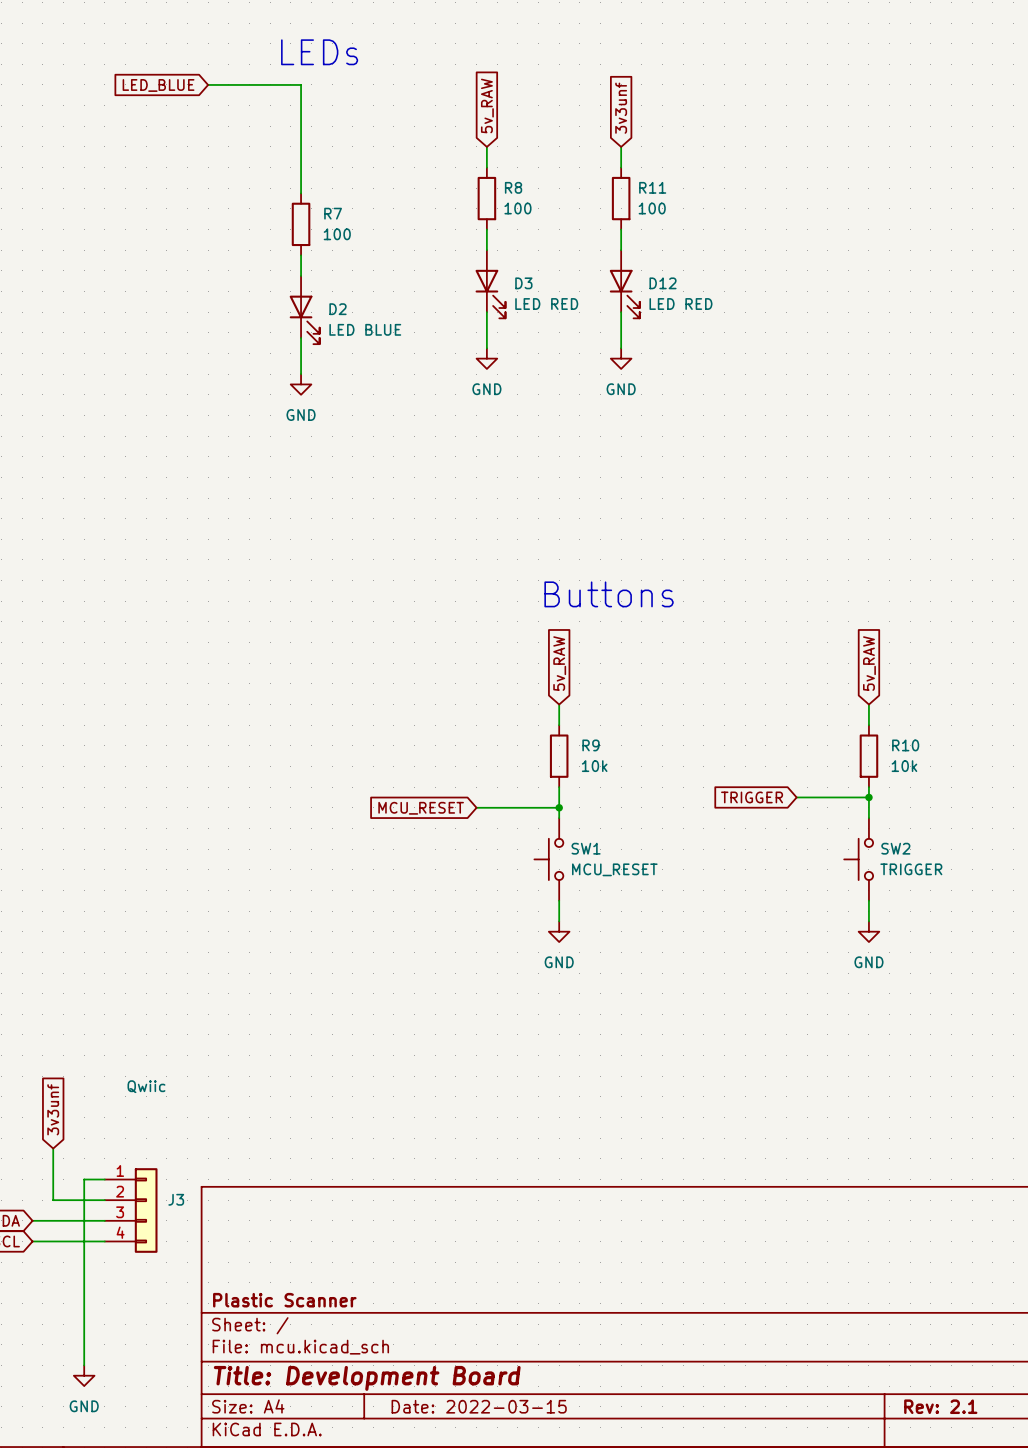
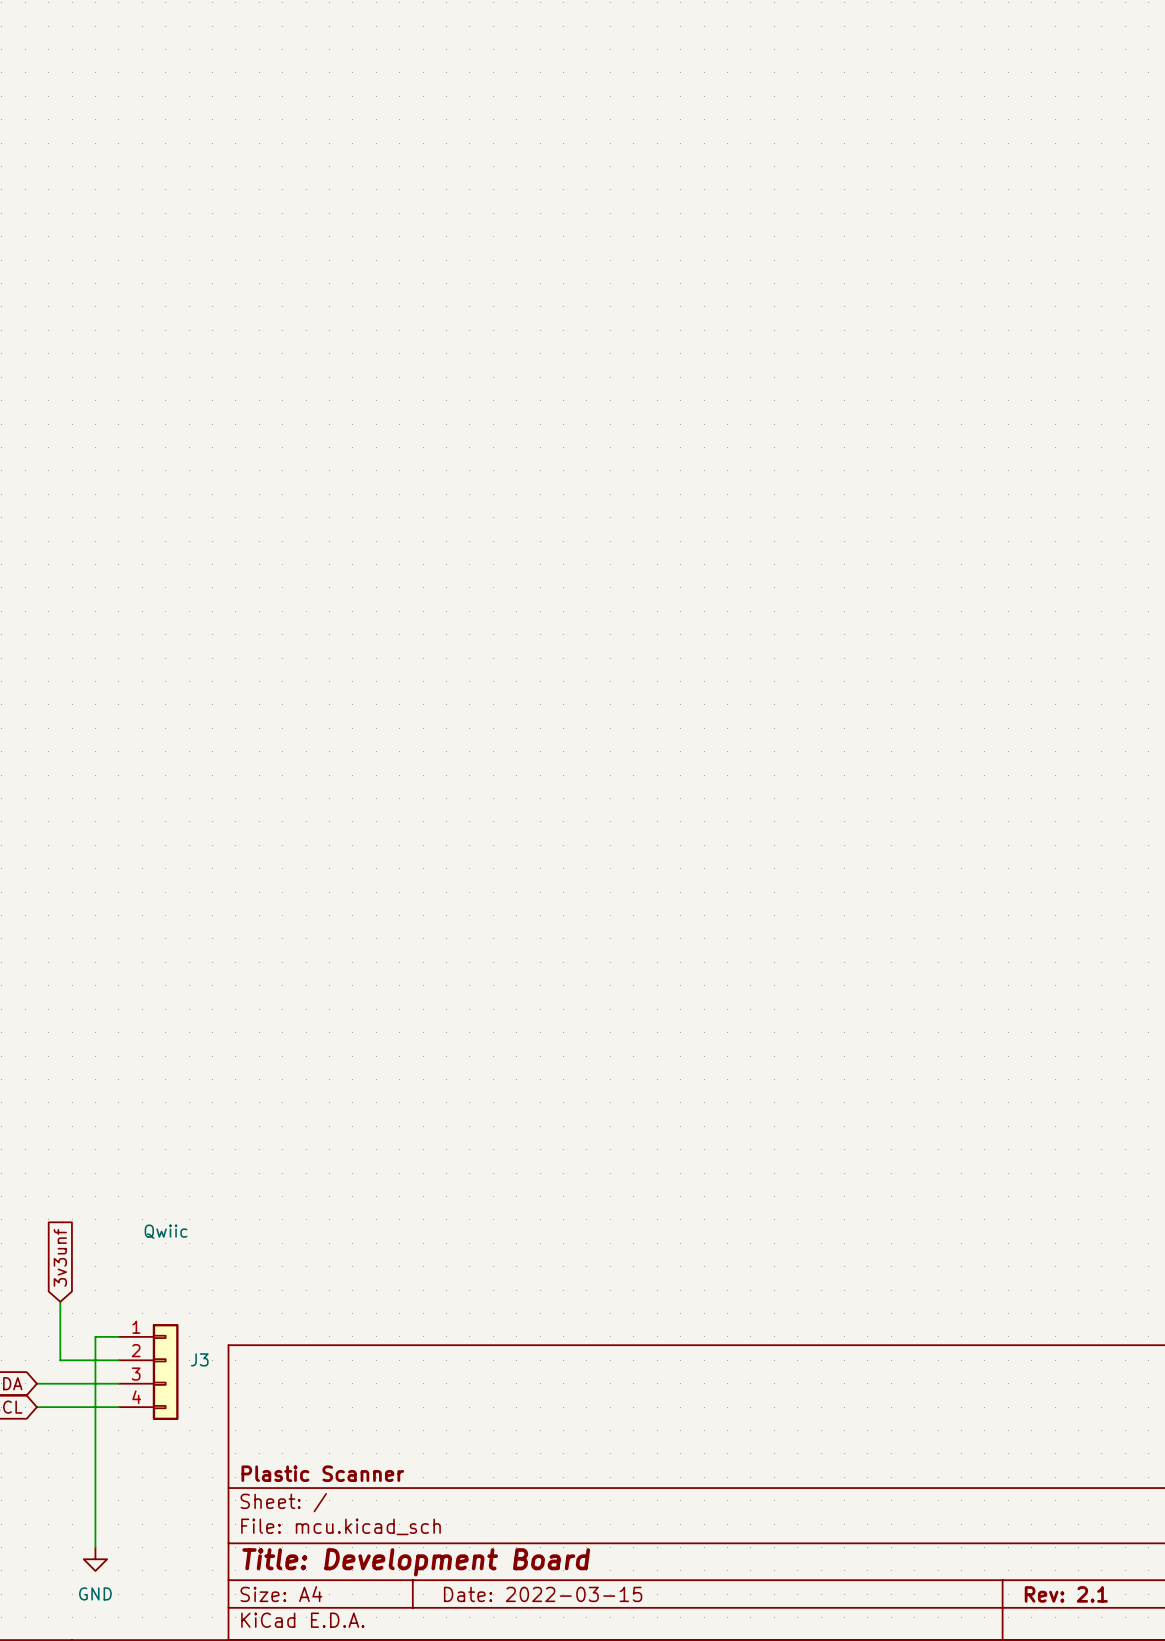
text: LEDs (319, 52) -> none
wire: (208, 84) (301, 84) (301, 193) -> none
global label: LED_BLUE (158, 85) -> none
global label: 5v_RAW (487, 105) -> none
global label: 3v3unf (621, 108) -> none
wire: (486, 146) (486, 167) -> none
wire: (621, 146) (621, 167) -> none
R8: 100 (486, 198) -> none
R11: 100 (621, 198) -> none
R7: 100 (301, 224) -> none
wire: (486, 229) (486, 250) -> none
wire: (621, 229) (621, 250) -> none
wire: (301, 255) (301, 276) -> none
D3: LED RED (490, 284) -> none
D12: LED RED (624, 284) -> none
D2: LED BLUE (304, 310) -> none
wire: (486, 312) (486, 348) -> none
wire: (621, 312) (621, 348) -> none
wire: (301, 337) (301, 374) -> none
power symbol: GND (486, 358) -> none
power symbol: GND (621, 358) -> none
power symbol: GND (301, 384) -> none
text: Buttons (609, 594) -> none
global label: 5v_RAW (559, 663) -> none
global label: 5v_RAW (869, 663) -> none
wire: (559, 704) (559, 725) -> none
wire: (868, 704) (868, 725) -> none
R9: 10k (559, 756) -> none
R10: 10k (868, 756) -> none
wire: (559, 787) (559, 818) -> none
wire: (868, 787) (868, 818) -> none
global label: TRIGGER (752, 797) -> none
wire: (796, 797) (868, 797) -> none
junction: (868, 797) -> none
wire: (476, 807) (559, 807) -> none
junction: (559, 807) -> none
global label: MCU_RESET (421, 808) -> none
SW1: MCU_RESET (548, 859) -> none
SW2: TRIGGER (858, 859) -> none
wire: (559, 900) (559, 921) -> none
wire: (868, 900) (868, 921) -> none
power symbol: GND (559, 931) -> none
power symbol: GND (868, 931) -> none

